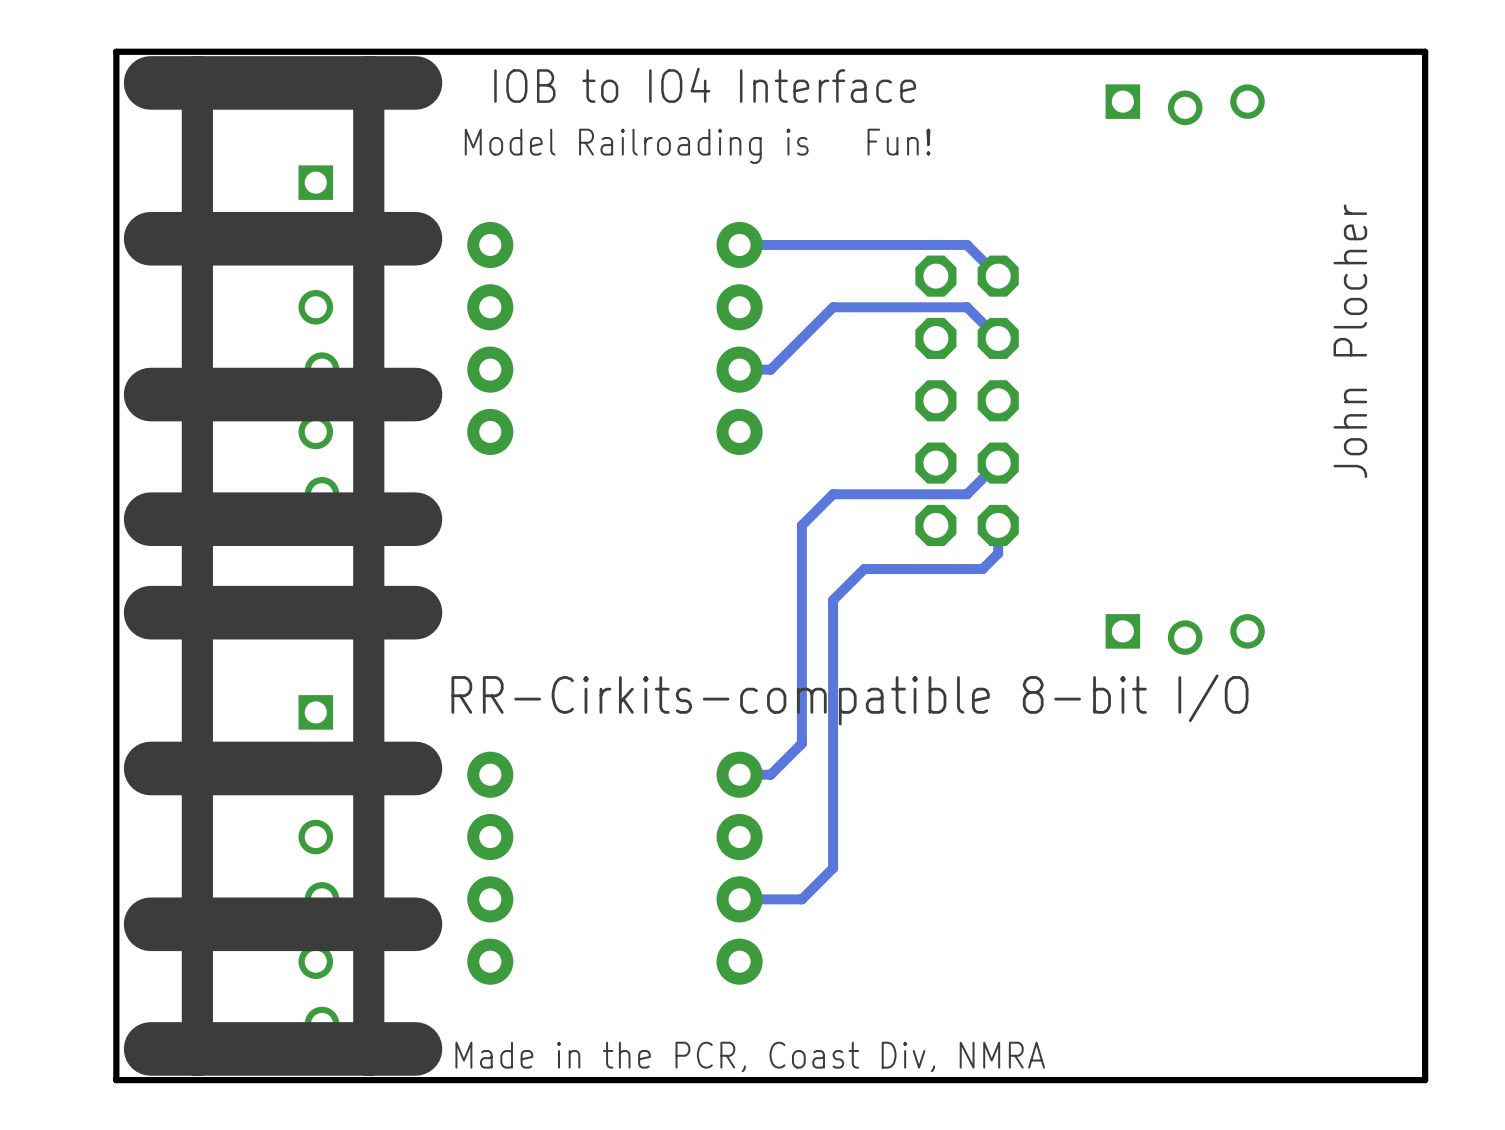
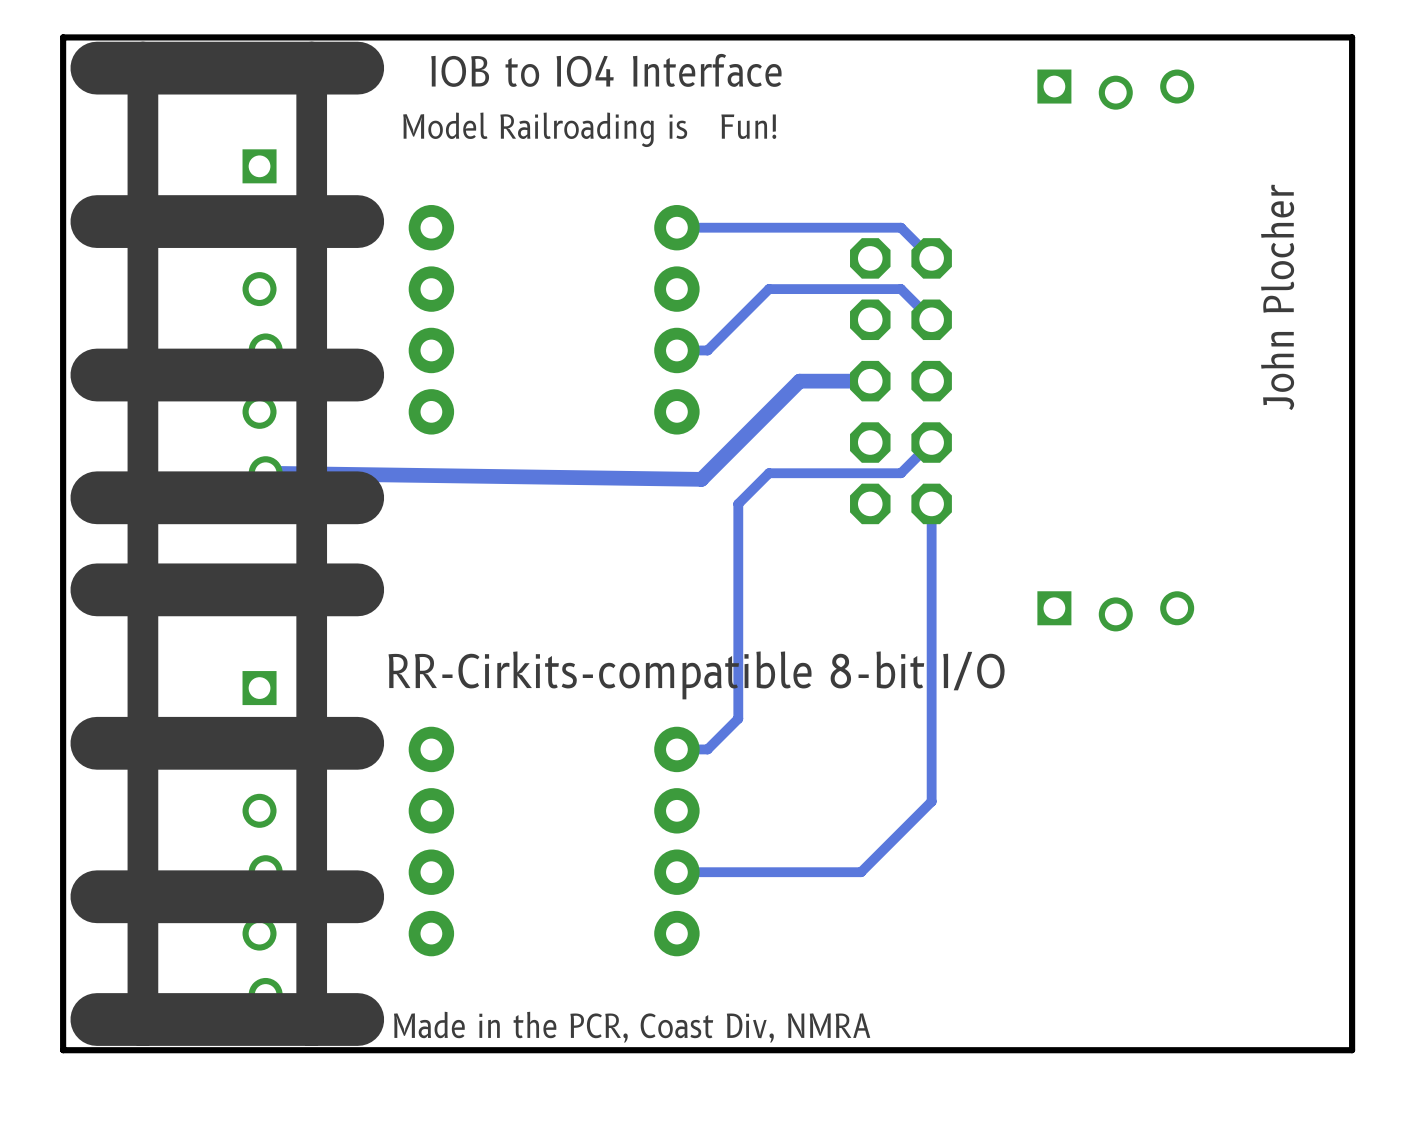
track: none -> (870, 381) (799, 381) (701, 479) (265, 473)
track: (998, 553) (982, 569) (864, 569) (833, 600) (833, 868) (801, 899) -> (931, 531) (931, 801) (861, 872) (738, 872)

